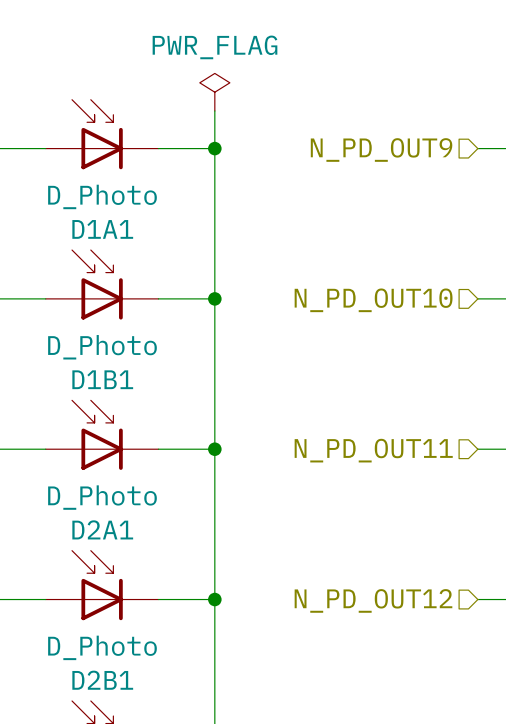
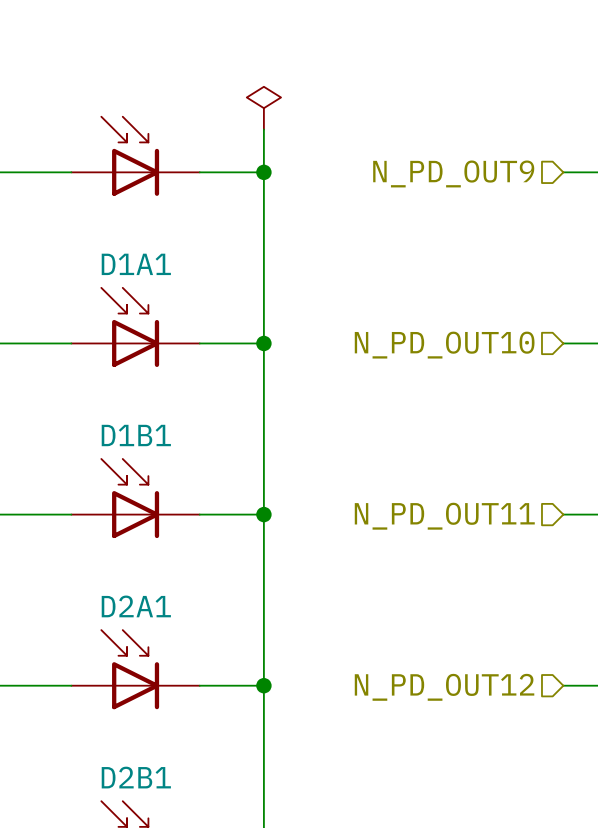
power symbol text: PWR_FLAG (214, 47) -> none
D1A1 value: D_Photo (102, 196) -> none
D1B1 value: D_Photo (102, 347) -> none
D2A1 value: D_Photo (102, 497) -> none
D2B1 value: D_Photo (102, 647) -> none

